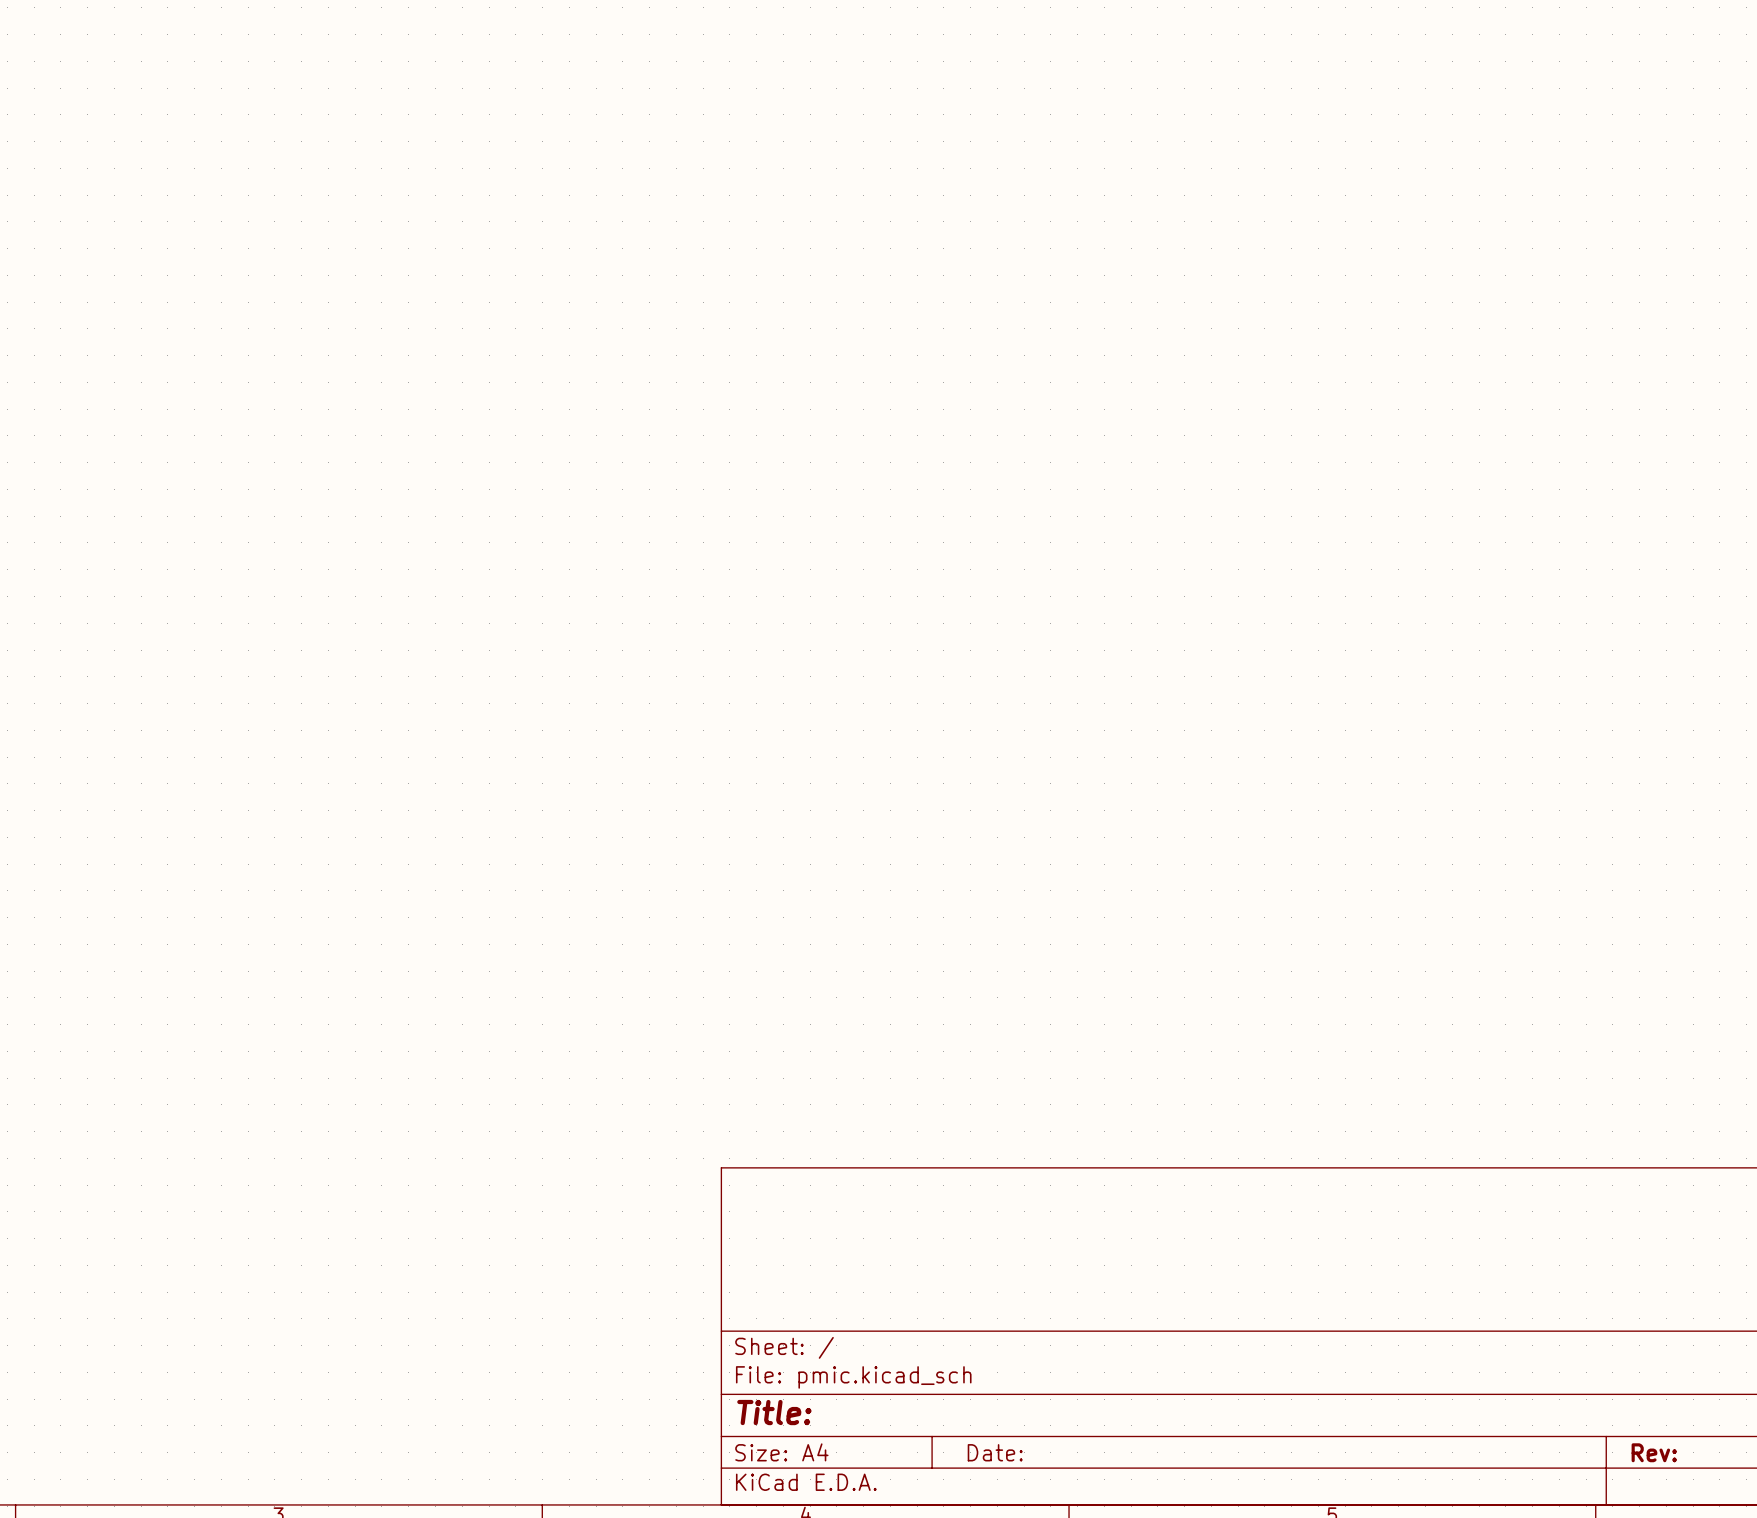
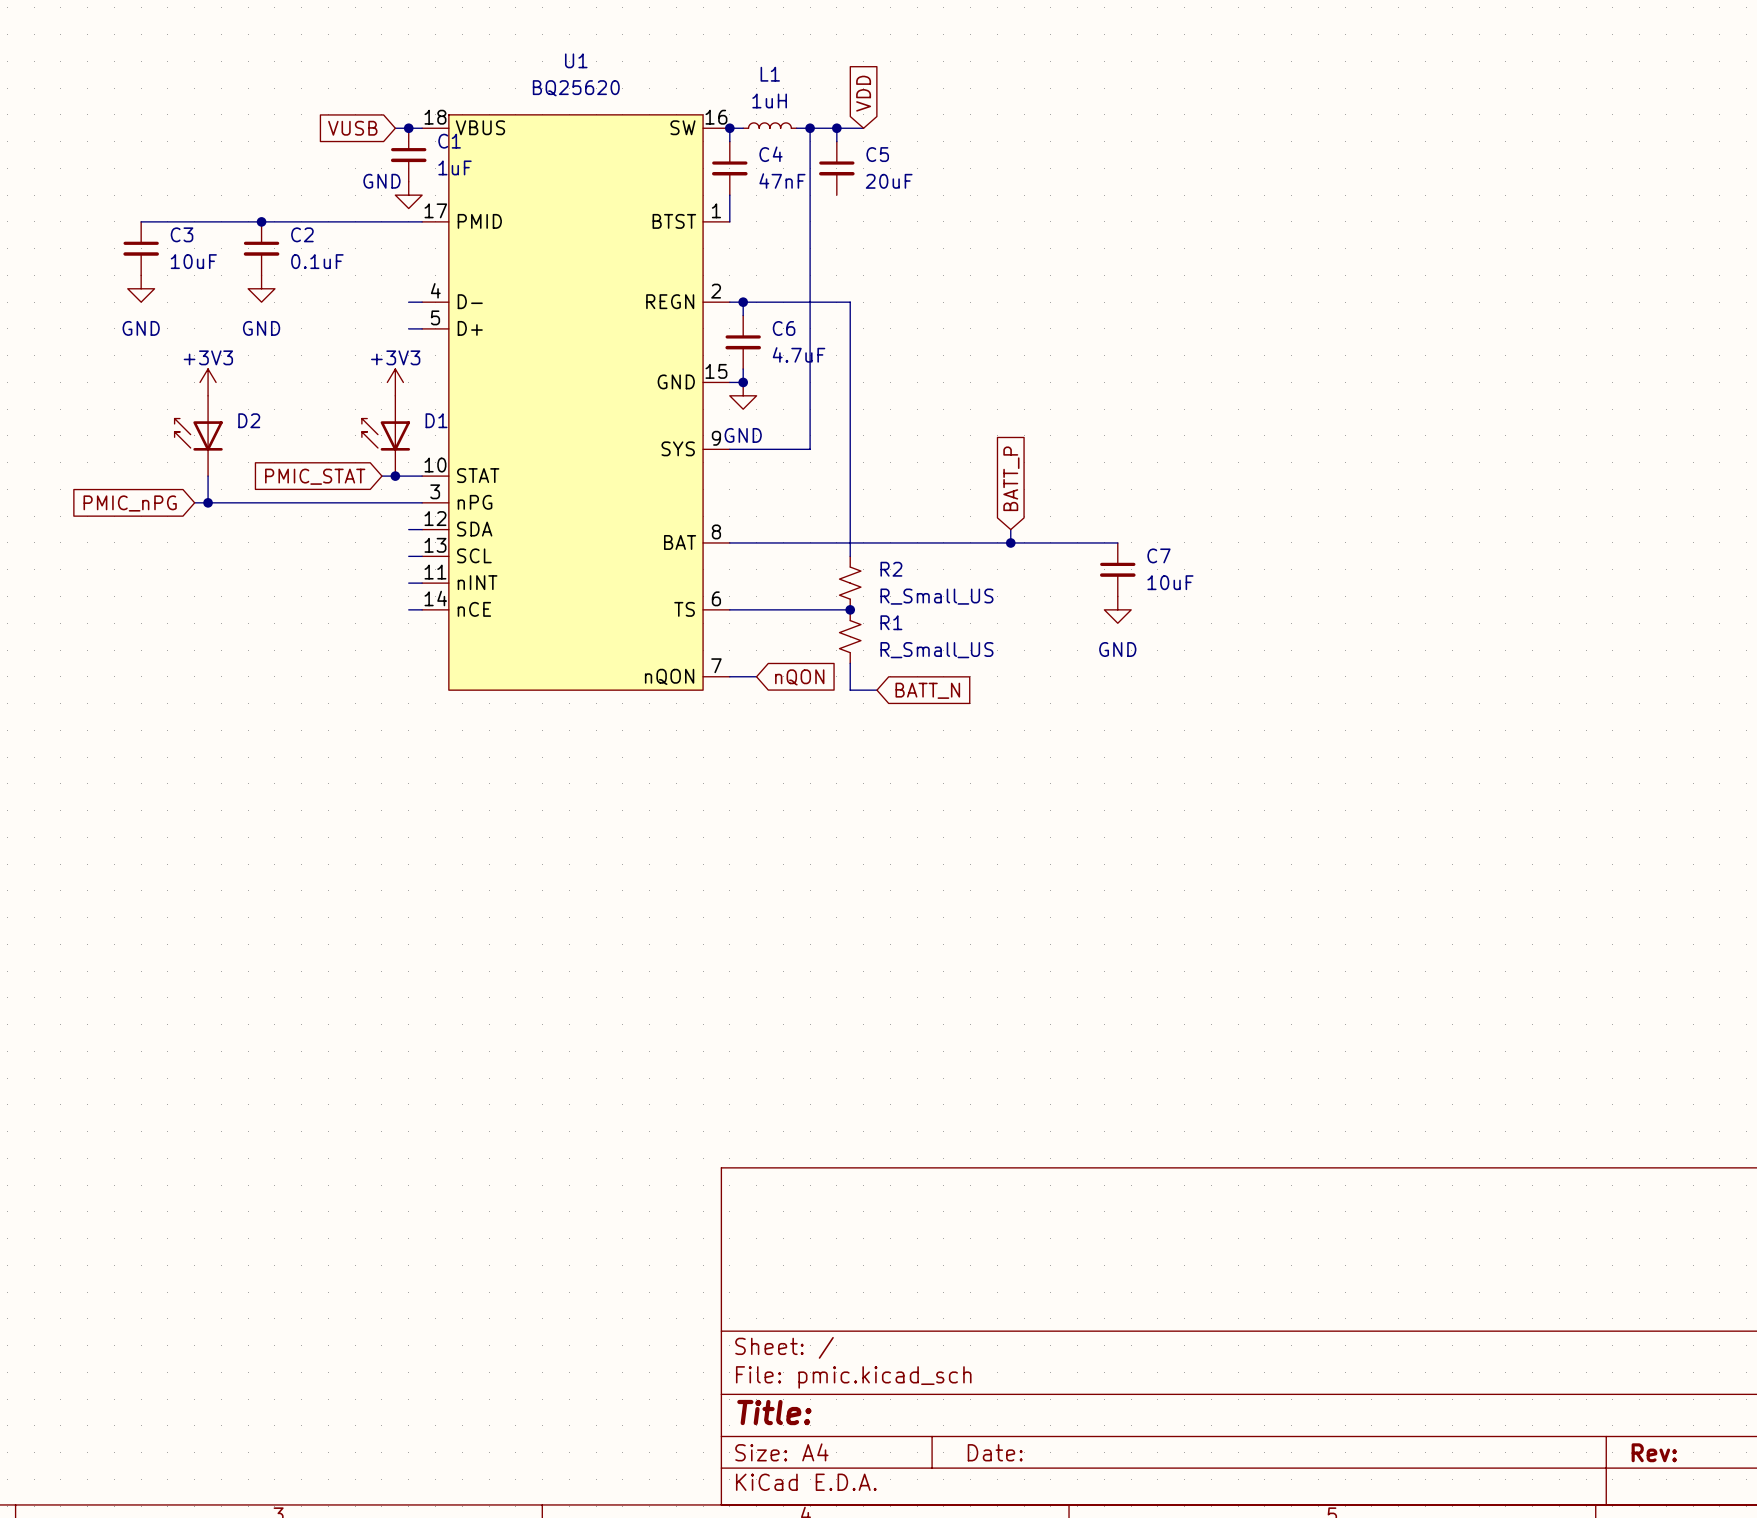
global label: none -> VDD (863, 93)
L1: none -> 1uH (769, 125)
global label: none -> VUSB (352, 128)
wire: none -> (395, 128) (422, 128)
junction: none -> (408, 128)
junction: none -> (729, 128)
wire: none -> (743, 128) (729, 128) (729, 141)
wire: none -> (796, 128) (863, 128)
wire: none -> (810, 128) (810, 449) (729, 449)
junction: none -> (810, 128)
wire: none -> (836, 128) (836, 141)
junction: none -> (836, 128)
C1: none -> 1uF (408, 155)
C4: none -> 47nF (729, 168)
C5: none -> 20uF (836, 168)
power symbol: none -> GND (408, 195)
wire: none -> (729, 195) (729, 221)
wire: none -> (141, 221) (422, 221)
junction: none -> (261, 221)
C3: none -> 10uF (141, 248)
C2: none -> 0.1uF (261, 248)
power symbol: none -> GND (141, 288)
power symbol: none -> GND (261, 288)
wire: none -> (408, 302) (422, 302)
wire: none -> (729, 302) (850, 302) (850, 556)
wire: none -> (743, 302) (743, 315)
junction: none -> (743, 302)
wire: none -> (408, 328) (422, 328)
C6: none -> 4.7uF (743, 342)
wire: none -> (743, 369) (743, 382) (729, 382)
power symbol: none -> +3V3 (208, 382)
power symbol: none -> +3V3 (395, 382)
junction: none -> (743, 382)
power symbol: none -> GND (743, 395)
U1: none -> BQ25620 (575, 402)
D2: none -> (198, 435)
D1: none -> (385, 435)
wire: none -> (208, 476) (208, 502)
global label: none -> PMIC_STAT (315, 476)
wire: none -> (381, 476) (422, 476)
junction: none -> (395, 476)
global label: none -> BATT_P (1011, 478)
wire: none -> (194, 502) (422, 502)
junction: none -> (208, 502)
global label: none -> PMIC_nPG (130, 503)
wire: none -> (408, 529) (422, 529)
wire: none -> (1010, 529) (1010, 542)
wire: none -> (729, 542) (1117, 542)
junction: none -> (1010, 542)
wire: none -> (408, 556) (422, 556)
C7: none -> 10uF (1117, 569)
wire: none -> (408, 583) (422, 583)
R2: none -> R_Small_US (850, 583)
wire: none -> (408, 609) (422, 609)
wire: none -> (729, 609) (850, 609)
junction: none -> (850, 609)
power symbol: none -> GND (1117, 609)
R1: none -> R_Small_US (850, 636)
wire: none -> (850, 663) (850, 690) (876, 690)
wire: none -> (729, 676) (756, 676)
global label: none -> nQON (799, 677)
global label: none -> BATT_N (927, 690)

